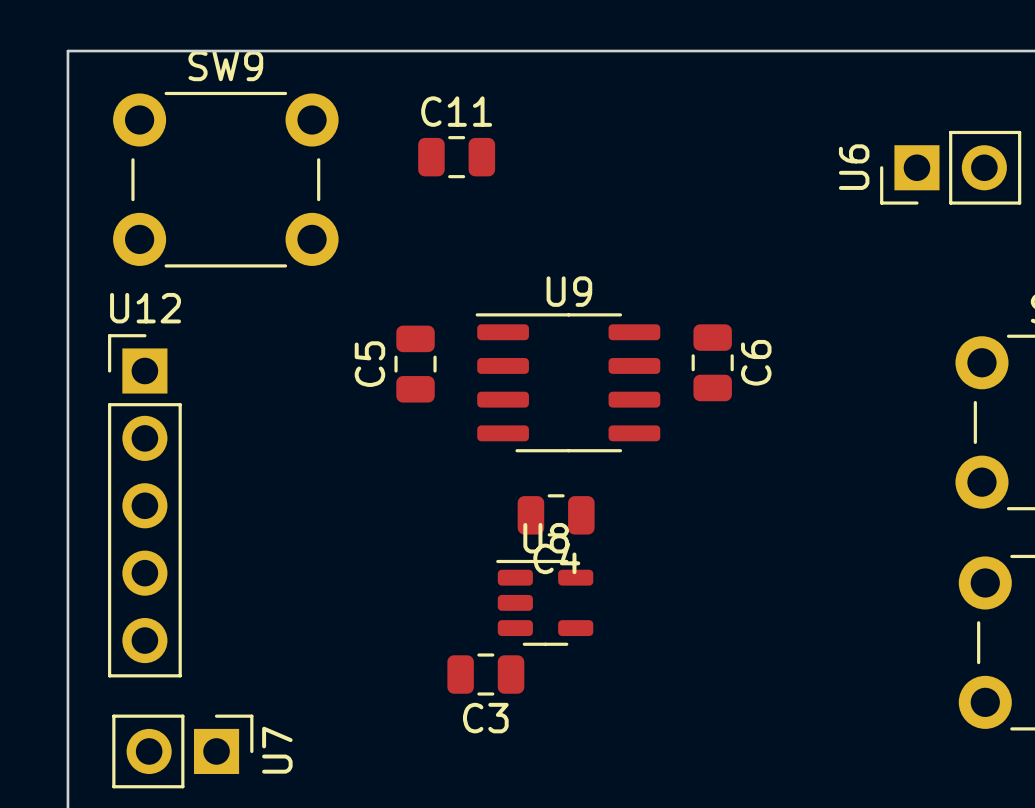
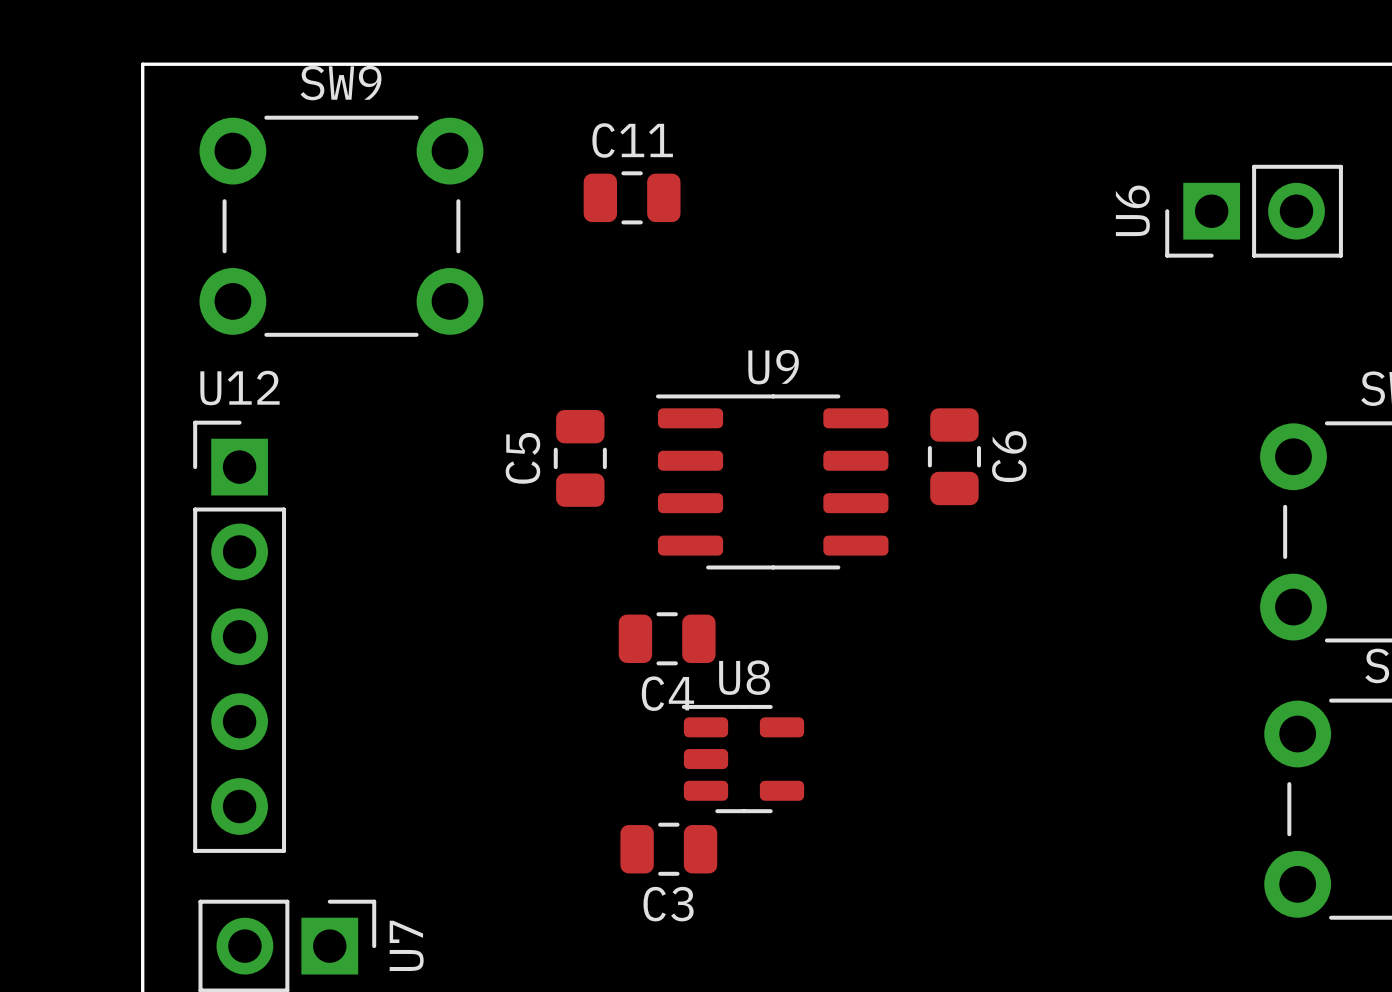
C4 position: (556, 515) -> (667, 638)

